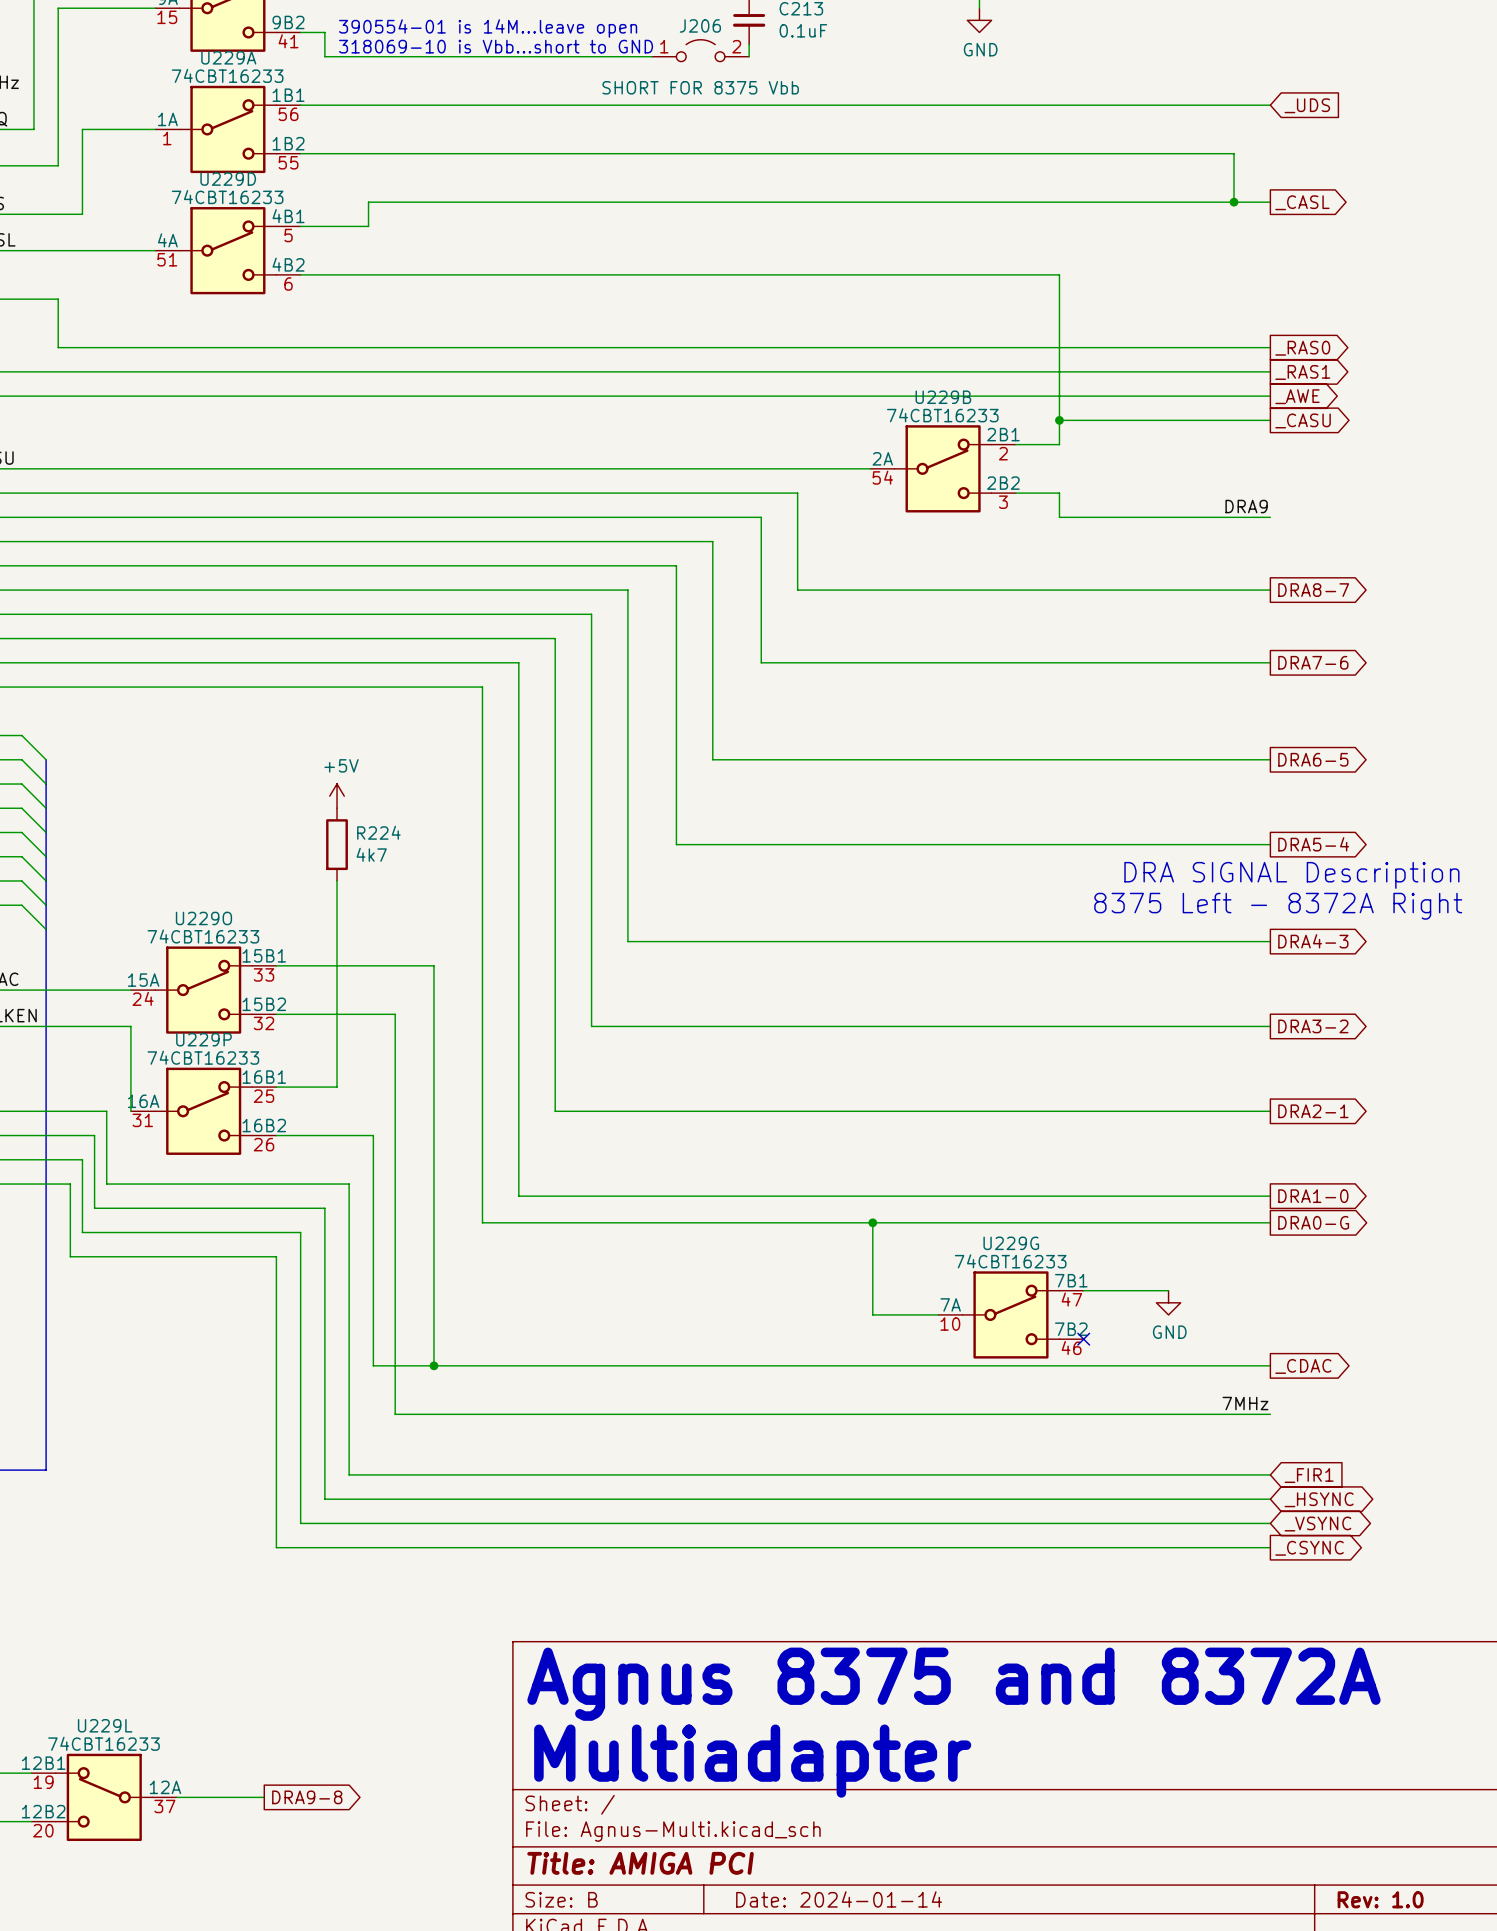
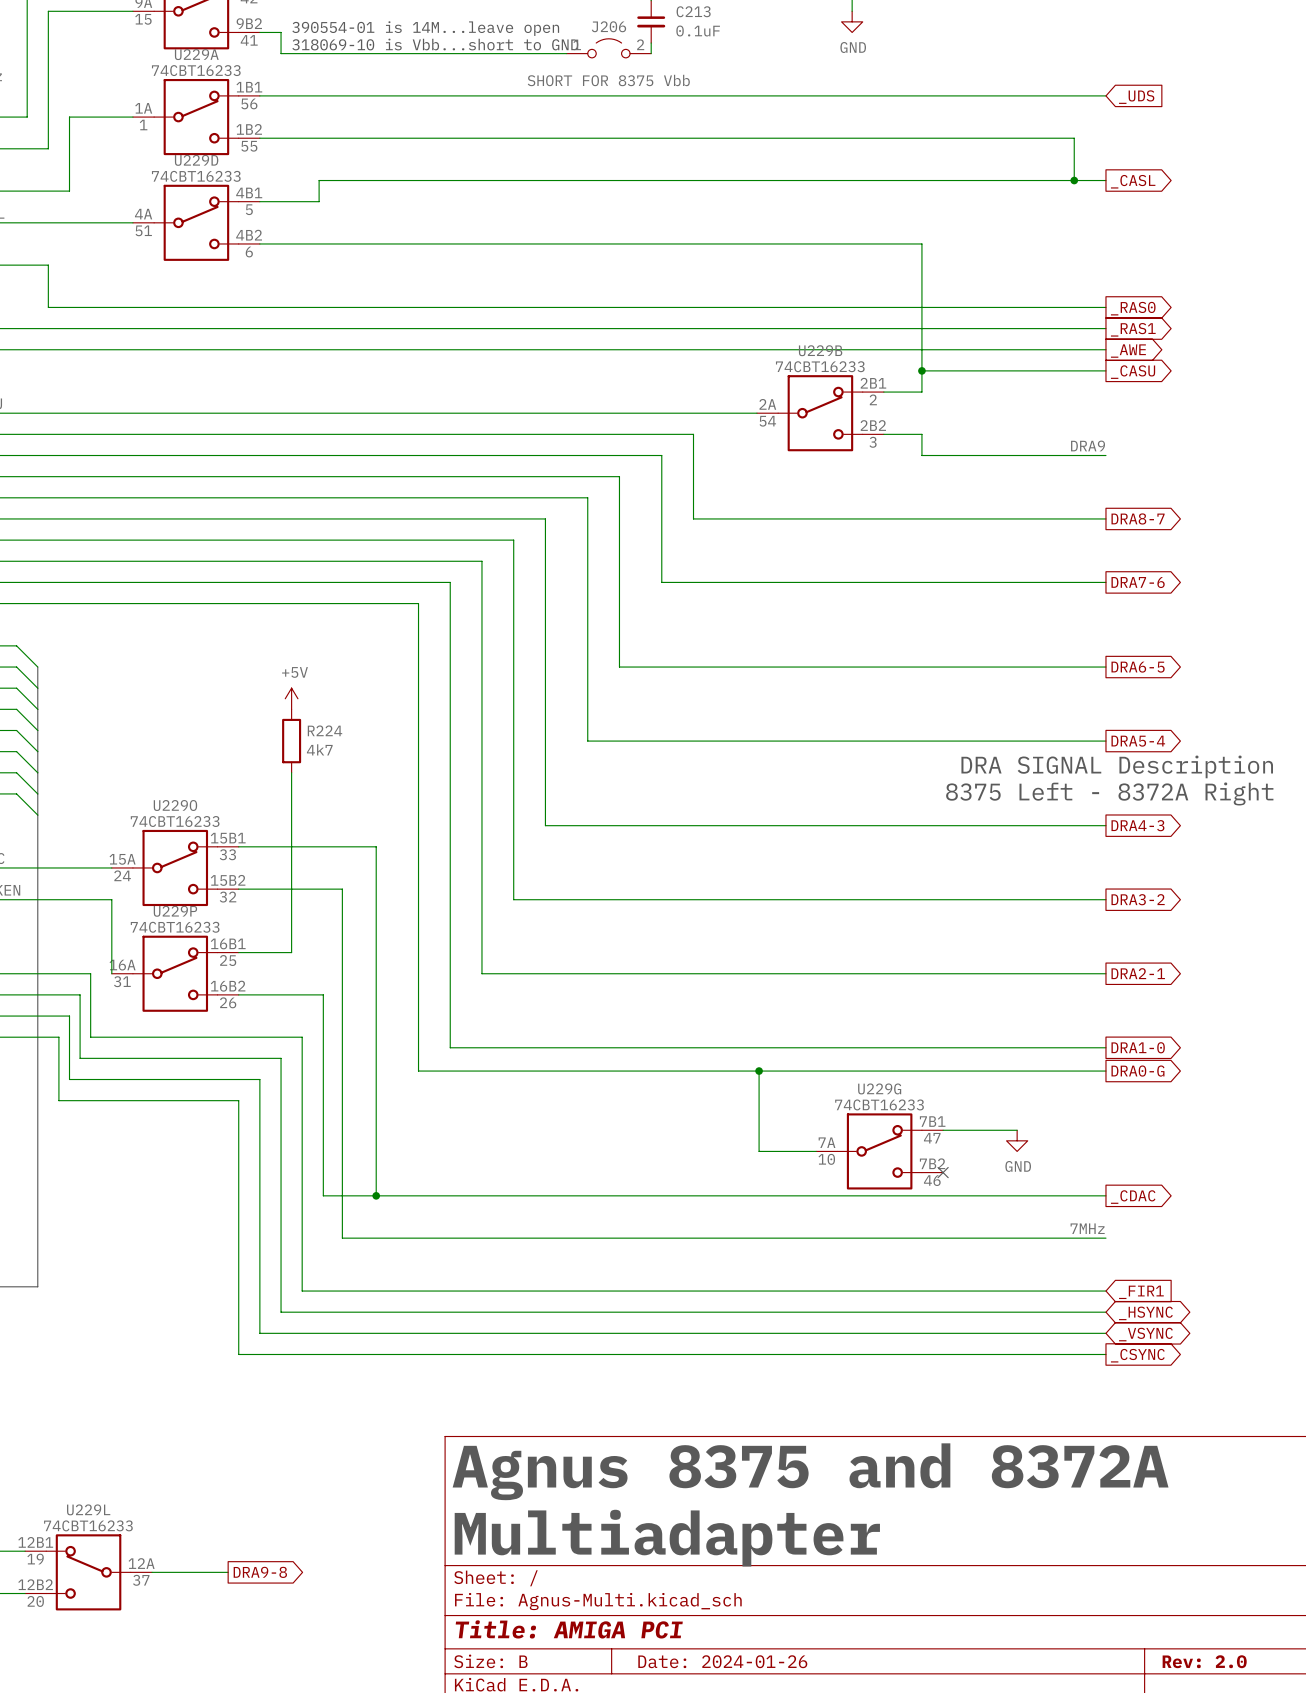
title block: Date: 2024-01-14 (839, 1899) -> Date: 2024-01-26 (722, 1661)
title block: Rev: 1.0 (1380, 1899) -> Rev: 2.0 (1204, 1661)

